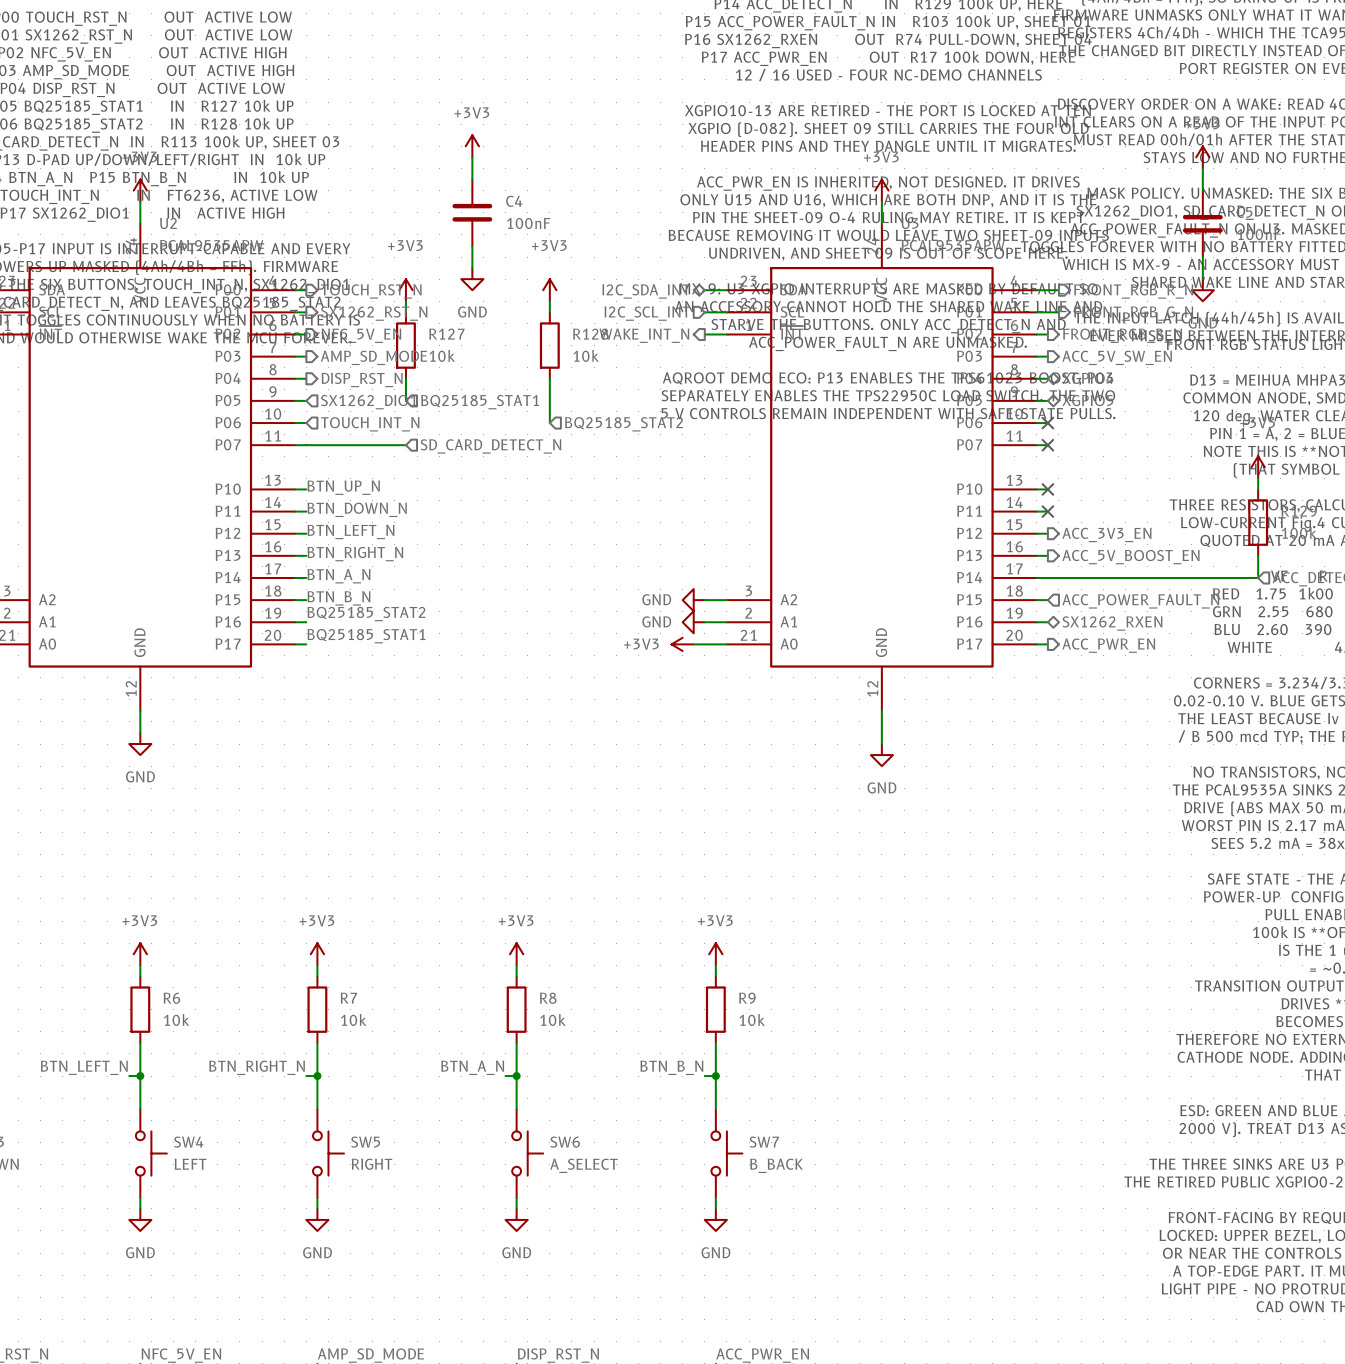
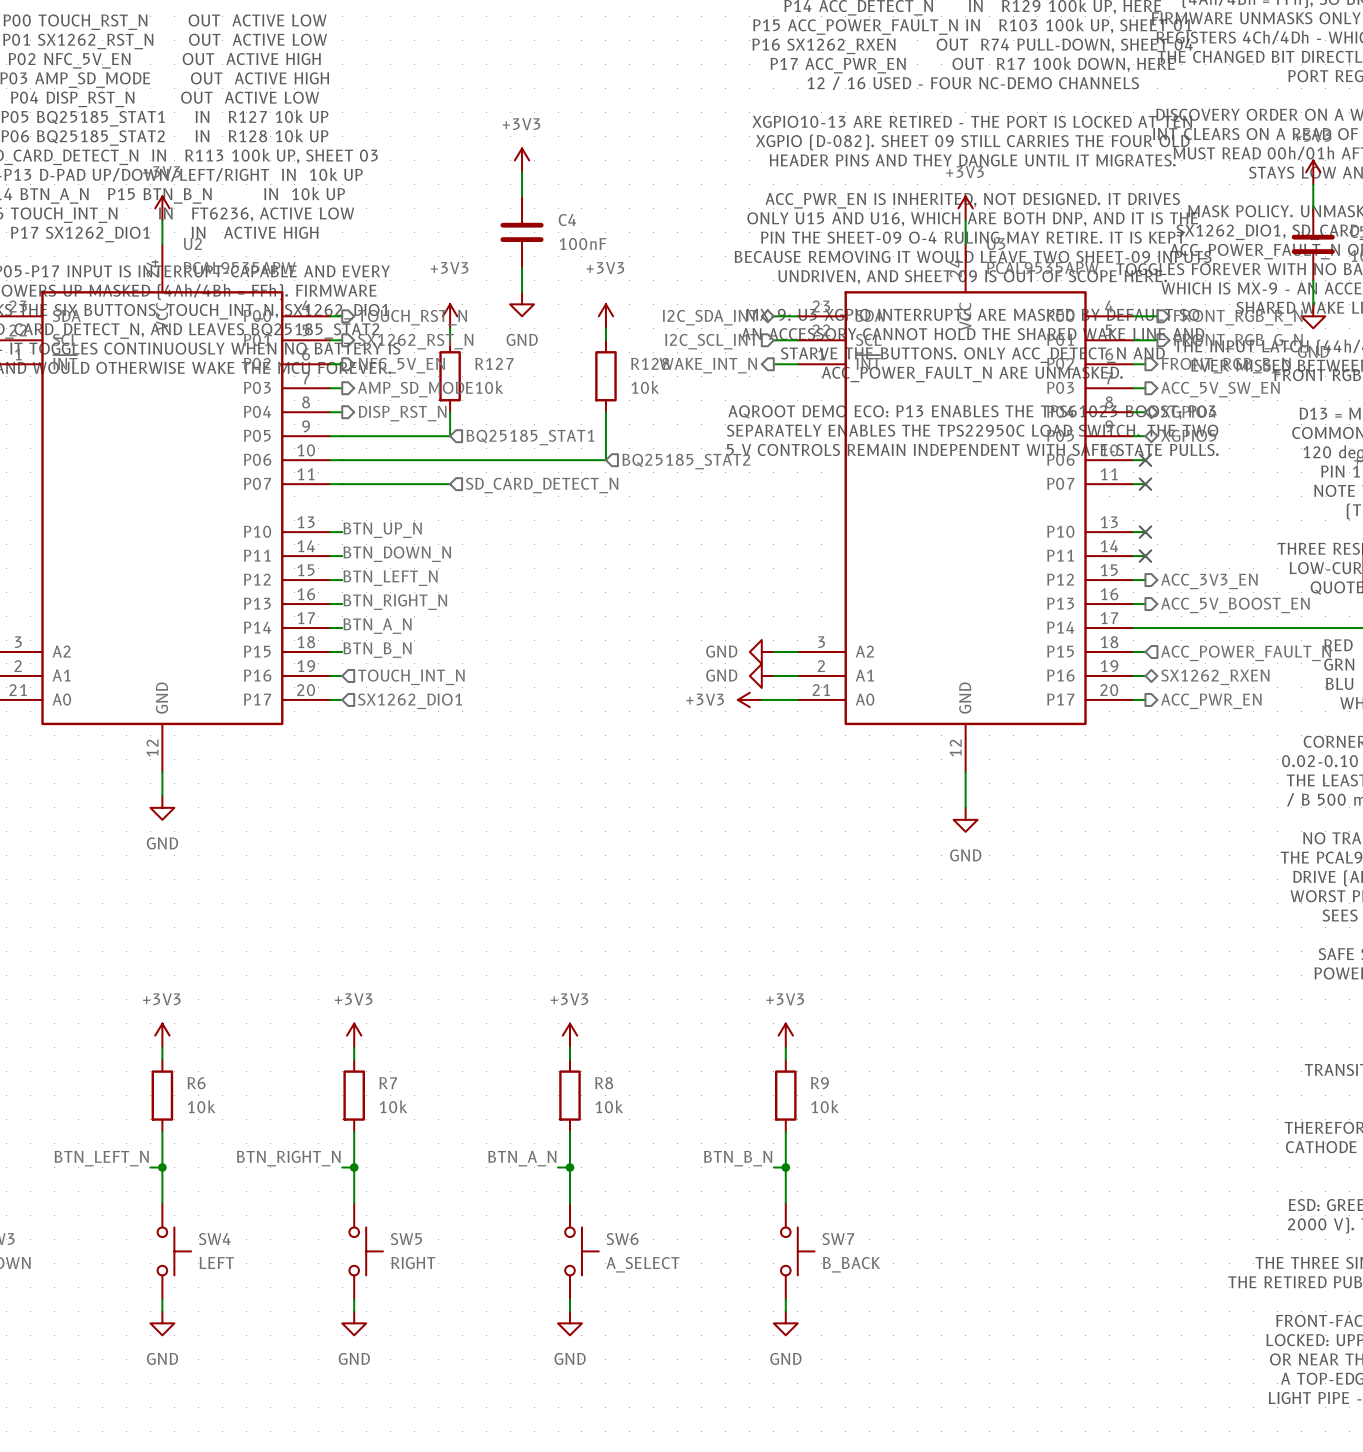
wire: none -> (342, 436) (450, 436)
hierarchical label: SX1262_DIO1 (368, 402) -> none
wire: none -> (342, 460) (605, 460)
hierarchical label position: TOUCH_INT_N (370, 424) -> TOUCH_INT_N (411, 677)
label: BQ25185_STAT2 (366, 614) -> none
label: BQ25185_STAT1 (366, 636) -> none
hierarchical label: none -> SX1262_DIO1 (410, 701)

